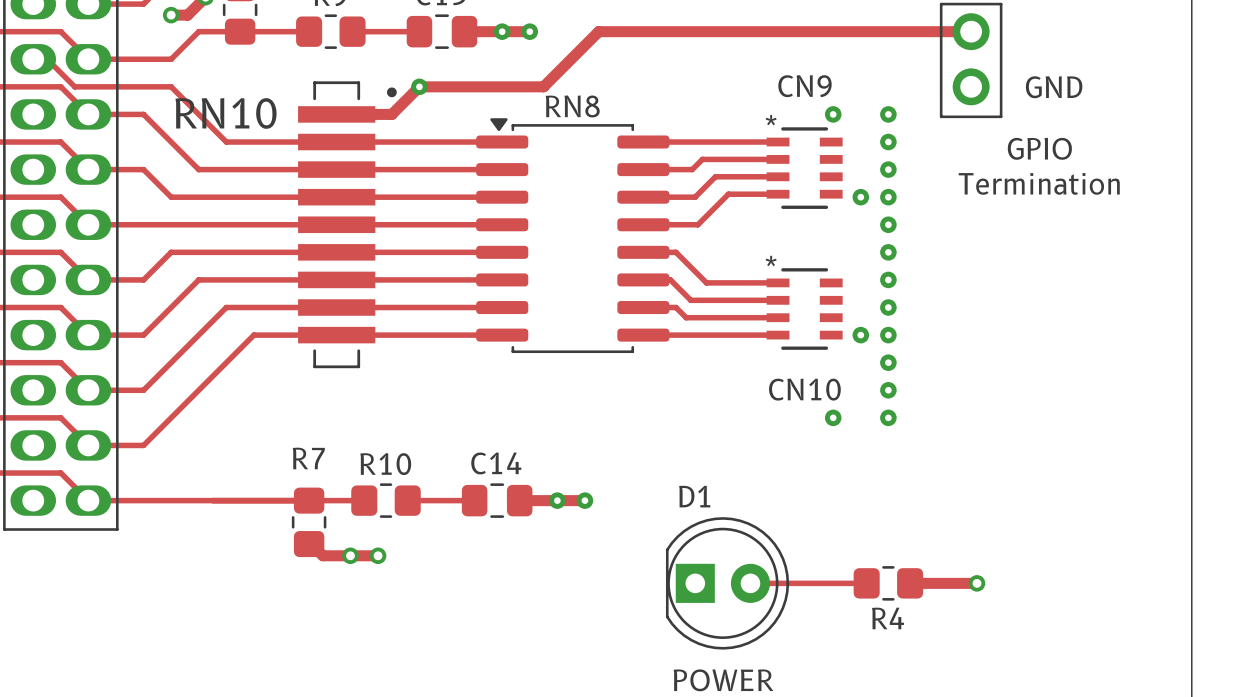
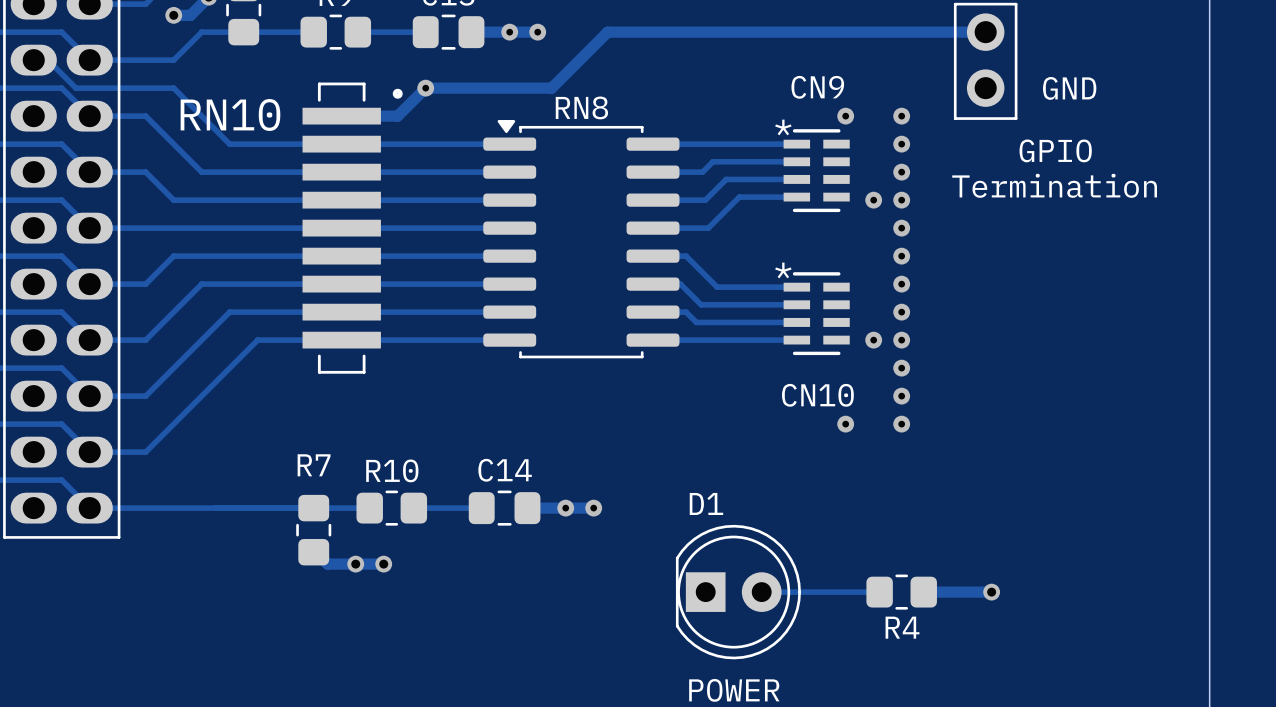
CN9 footprint: [766, 127, 843, 209] -> [783, 129, 850, 213]
CN10 footprint: [766, 268, 843, 350] -> [783, 272, 850, 356]

